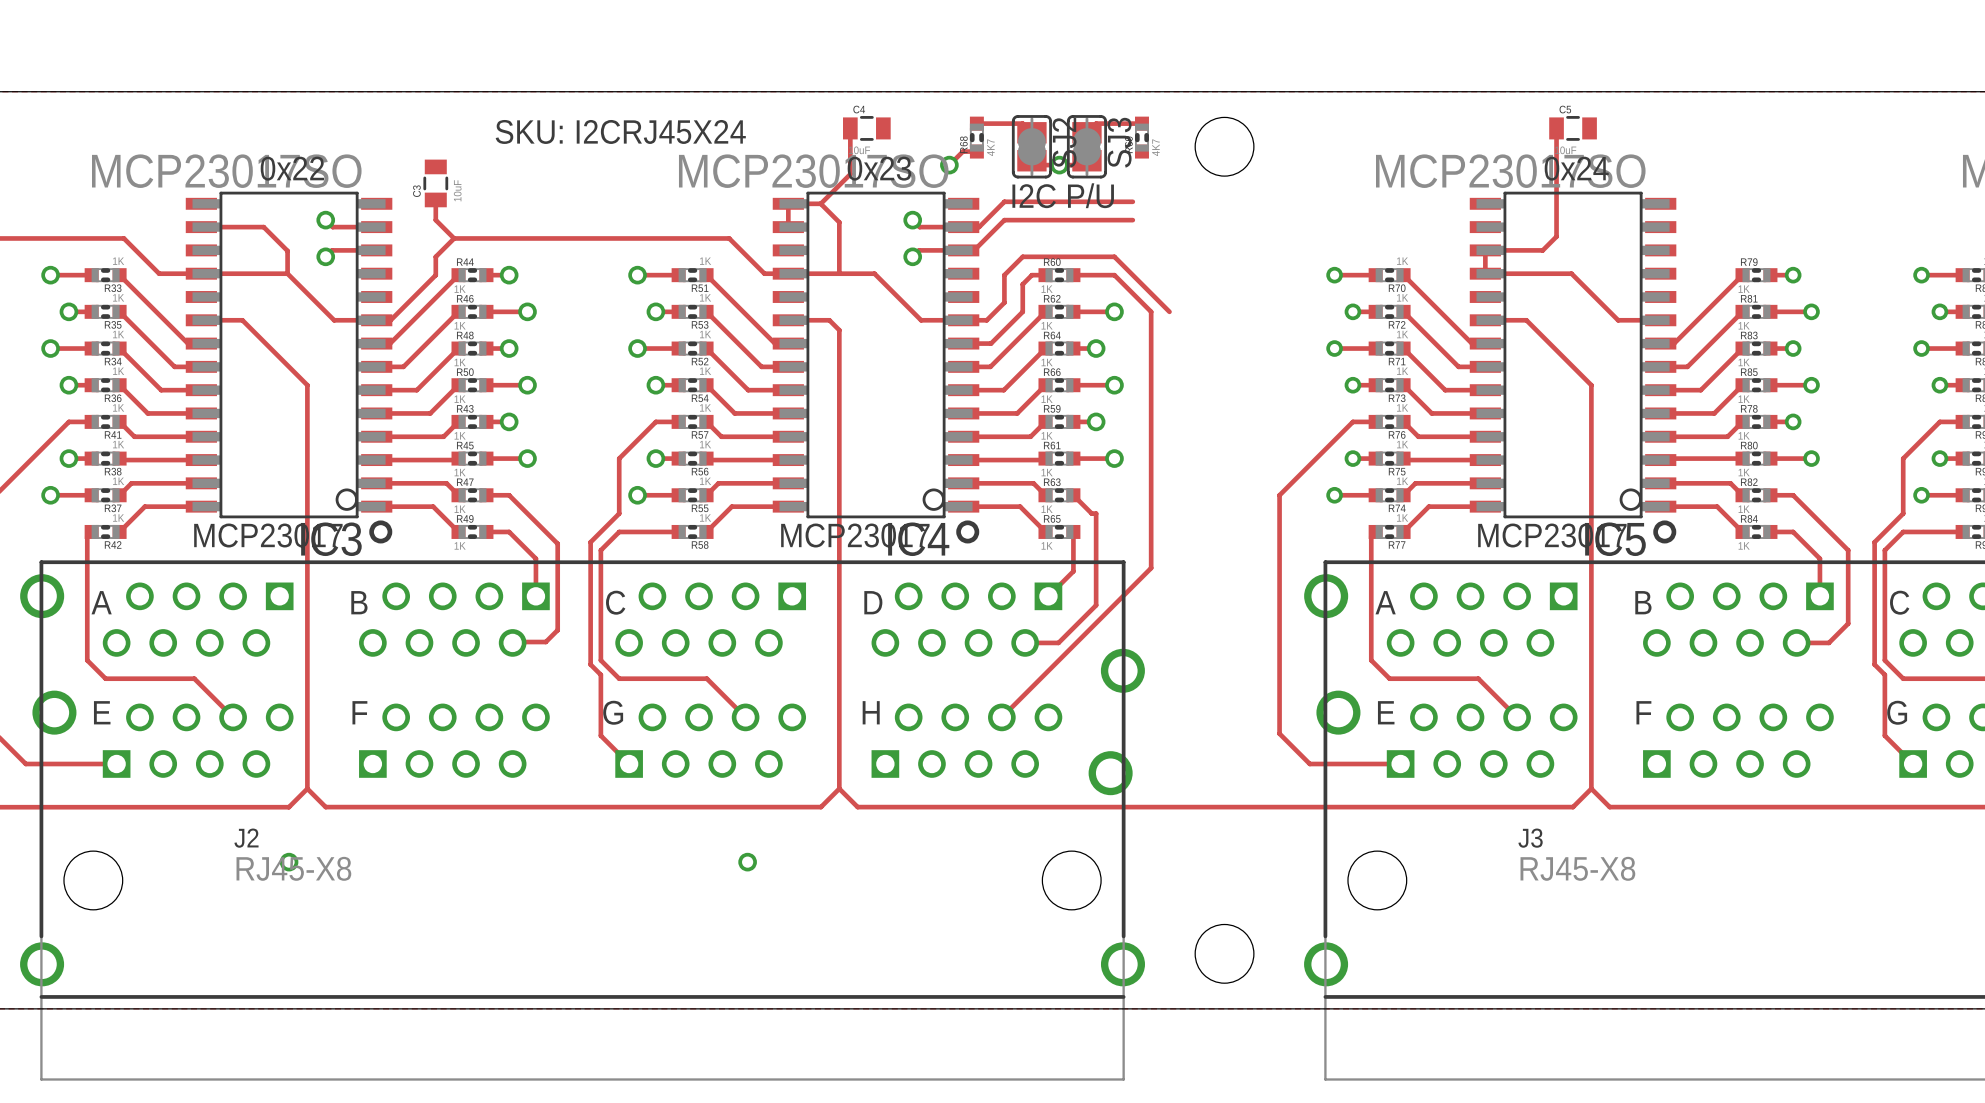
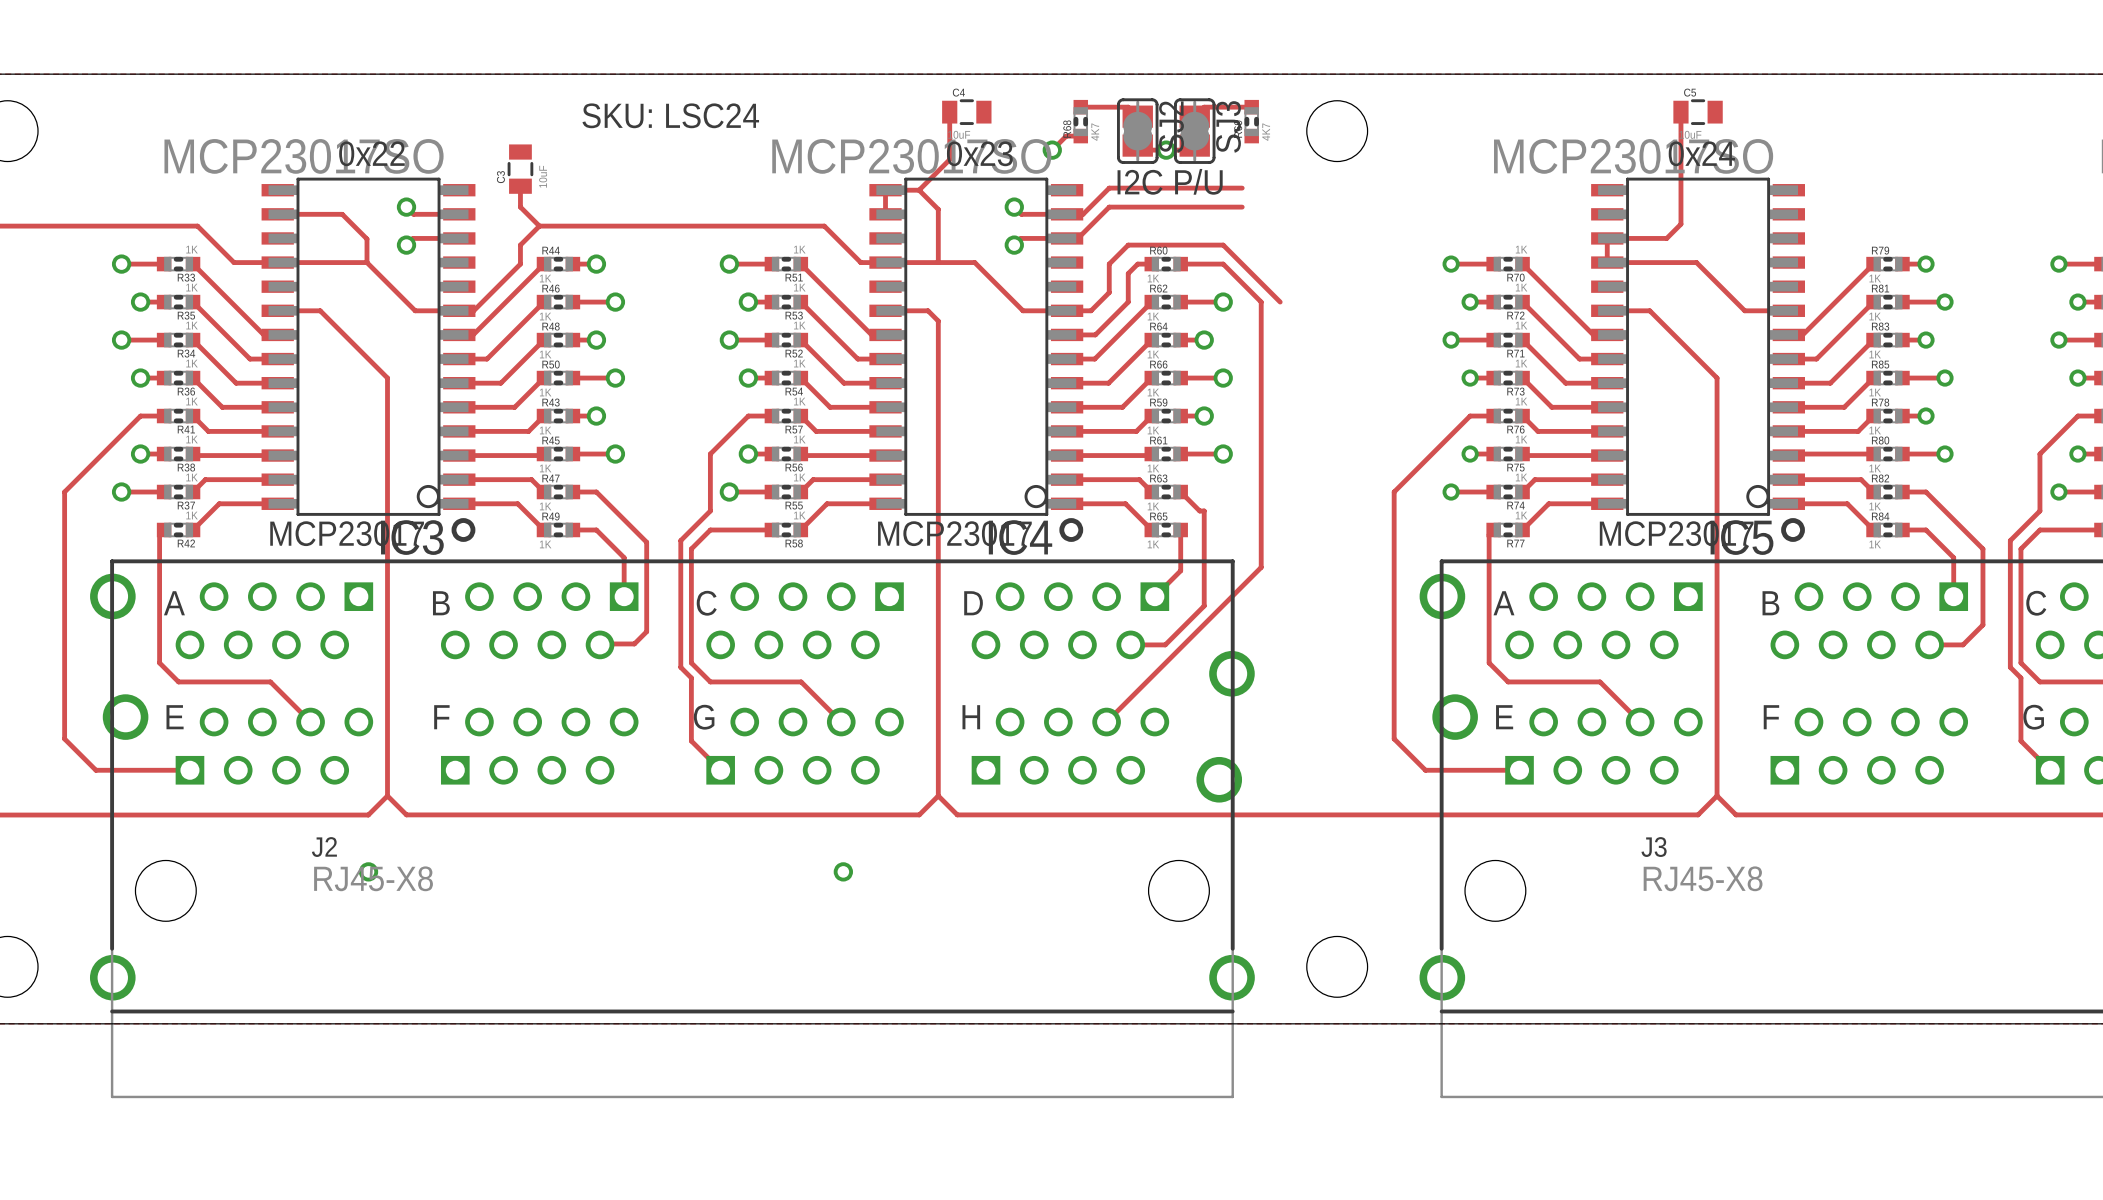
text: SKU: I2CRJ45X24 (620, 131) -> SKU: LSC24 (670, 115)

